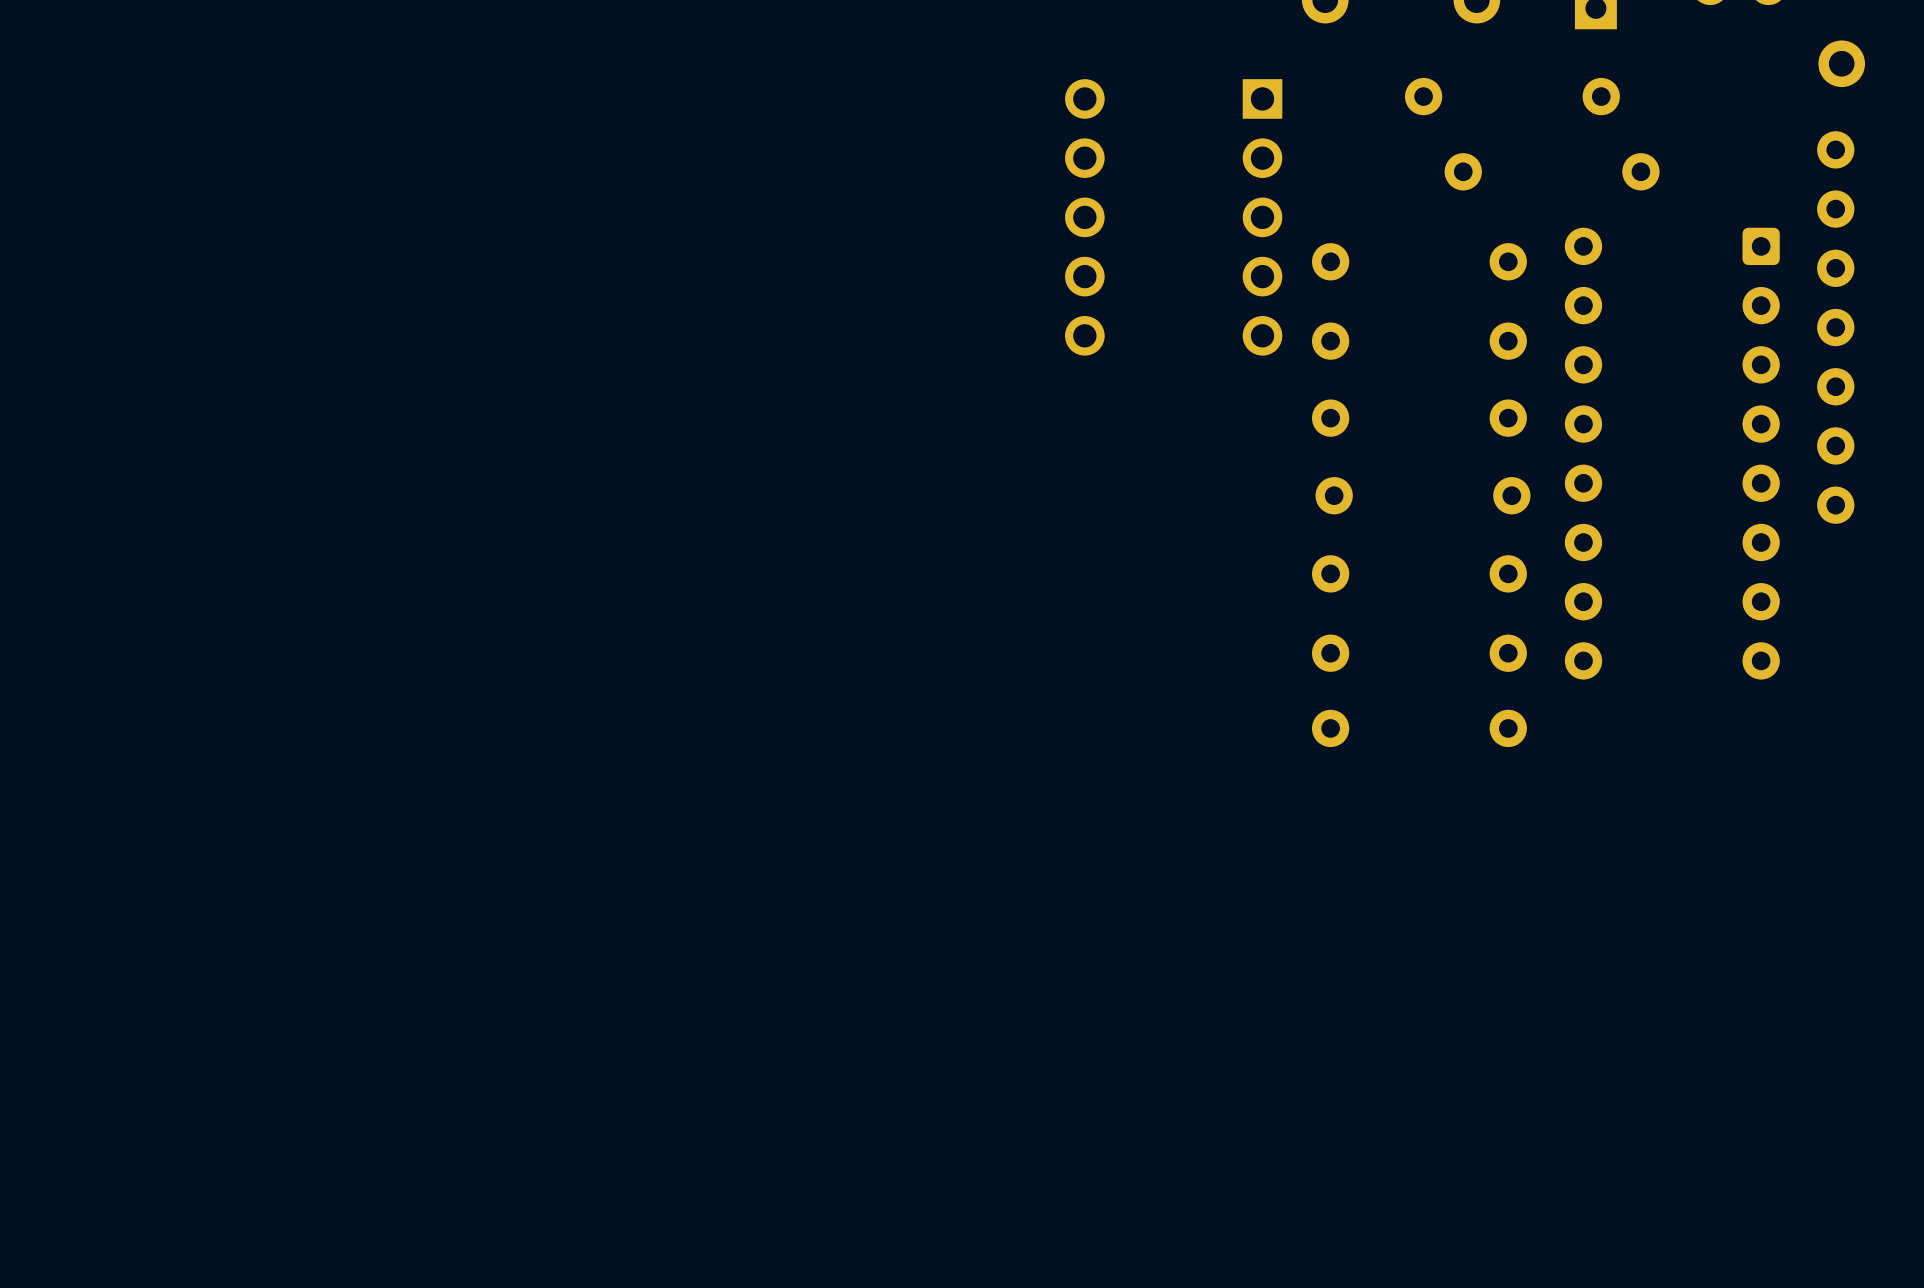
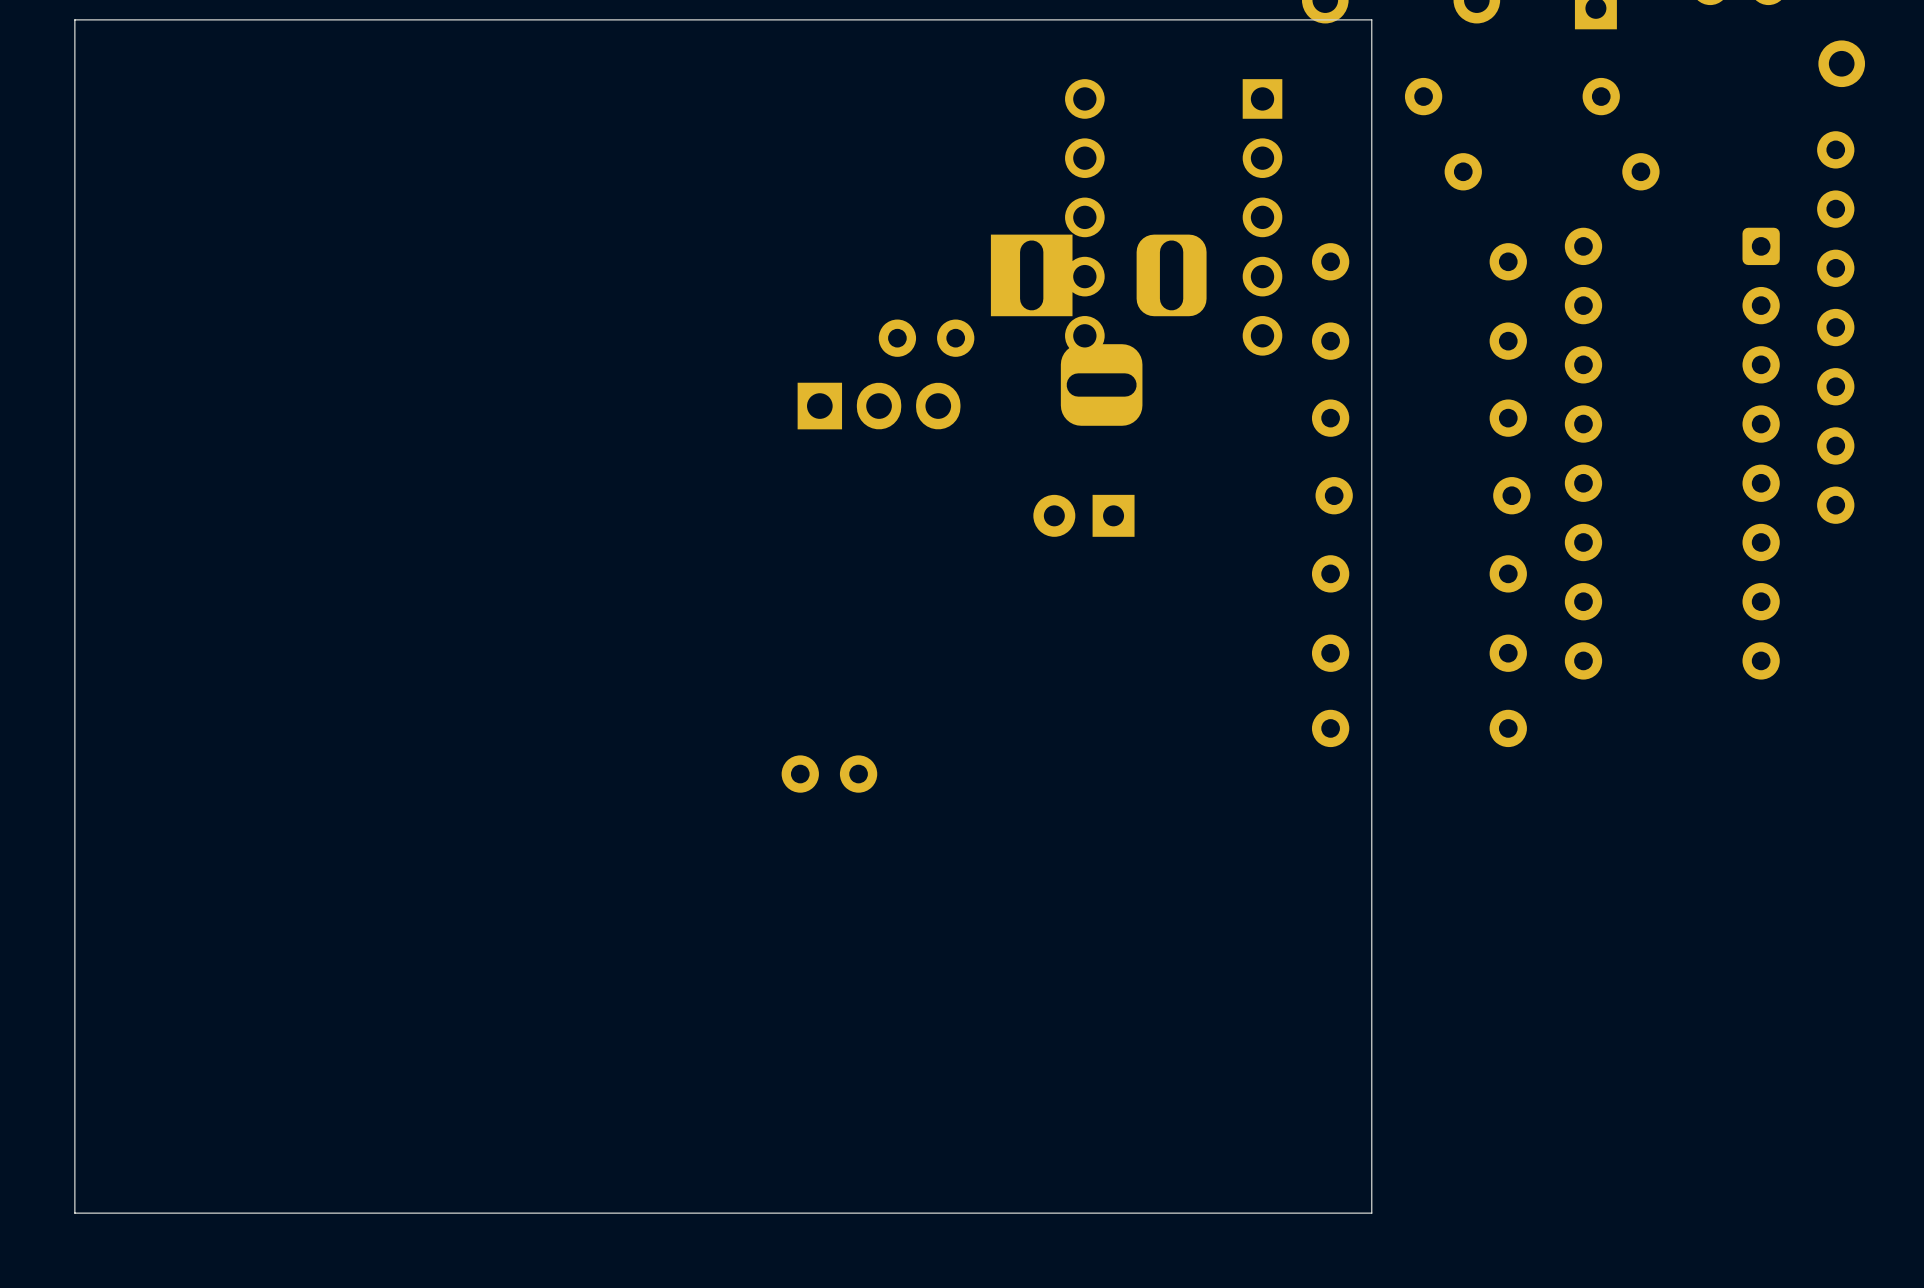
board edge: none -> (1371, 19) (74, 19) (74, 1213) (1371, 1213) (1371, 19)
part: none -> (1098, 330)
part: none -> (926, 338)
part: none -> (879, 406)
part: none -> (1083, 515)
part: none -> (829, 774)

